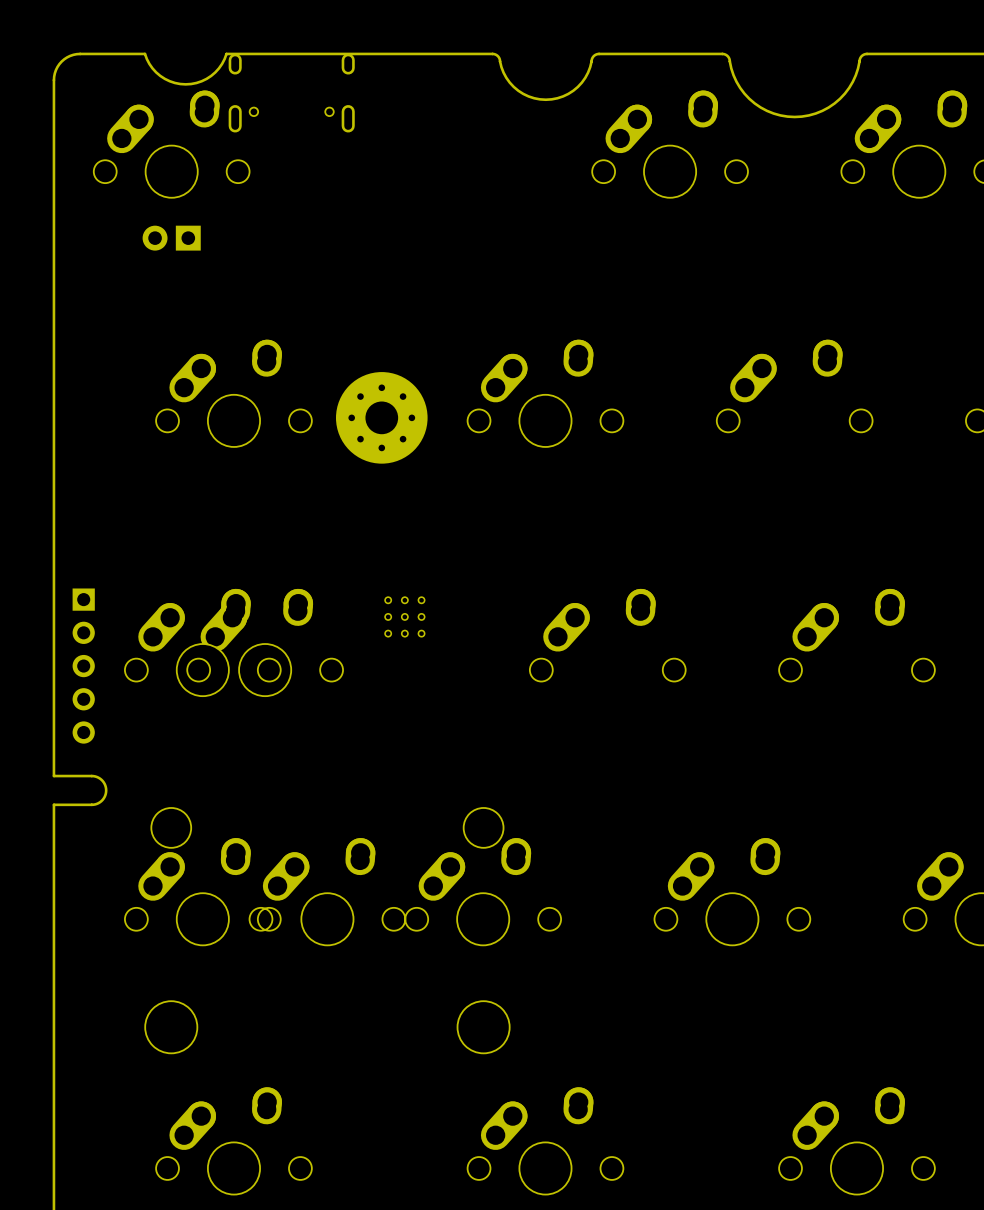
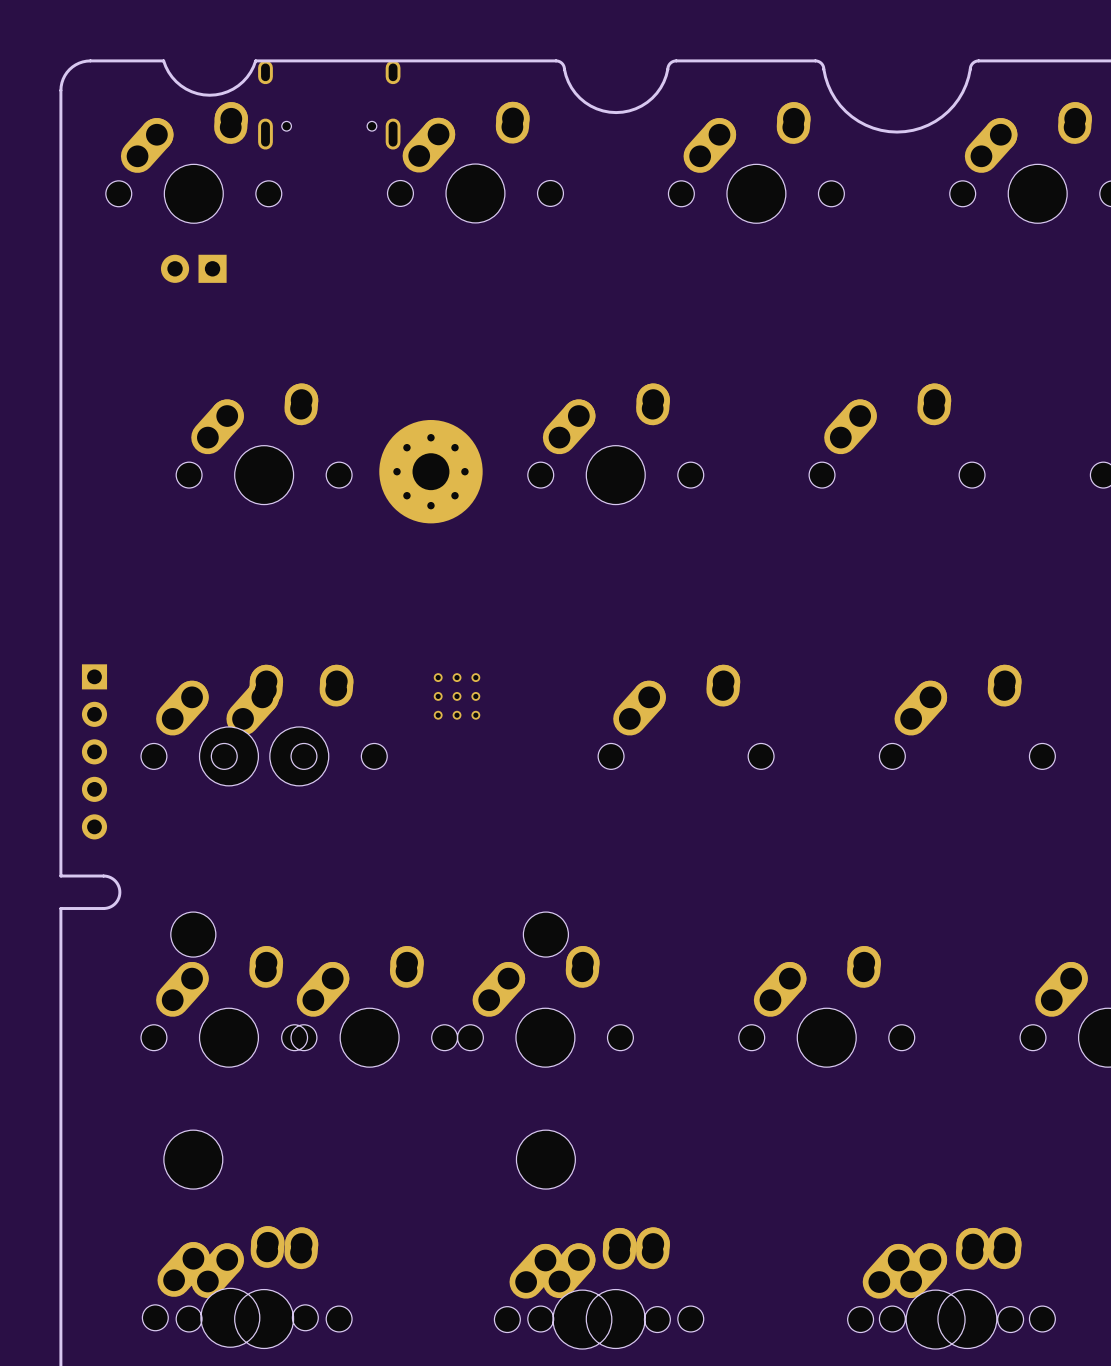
part: none -> (475, 162)
part: none -> (230, 1286)
part: none -> (582, 1288)
part: none -> (935, 1288)

